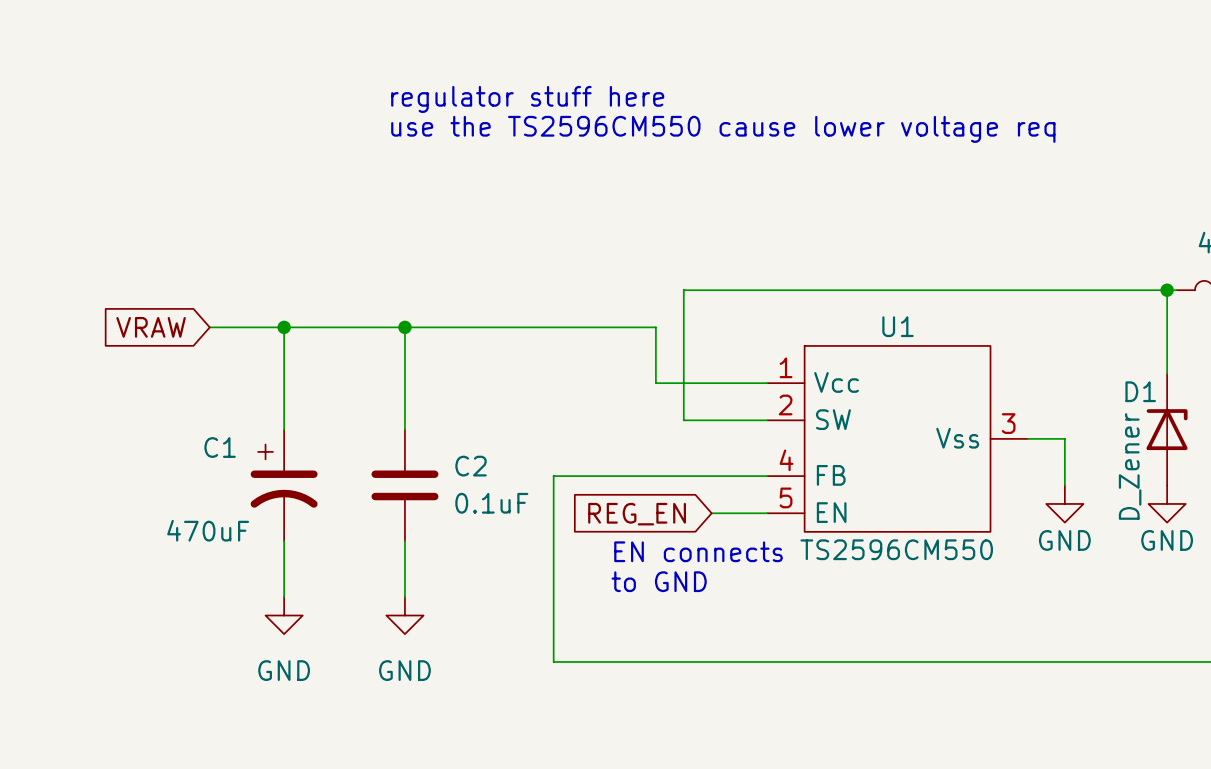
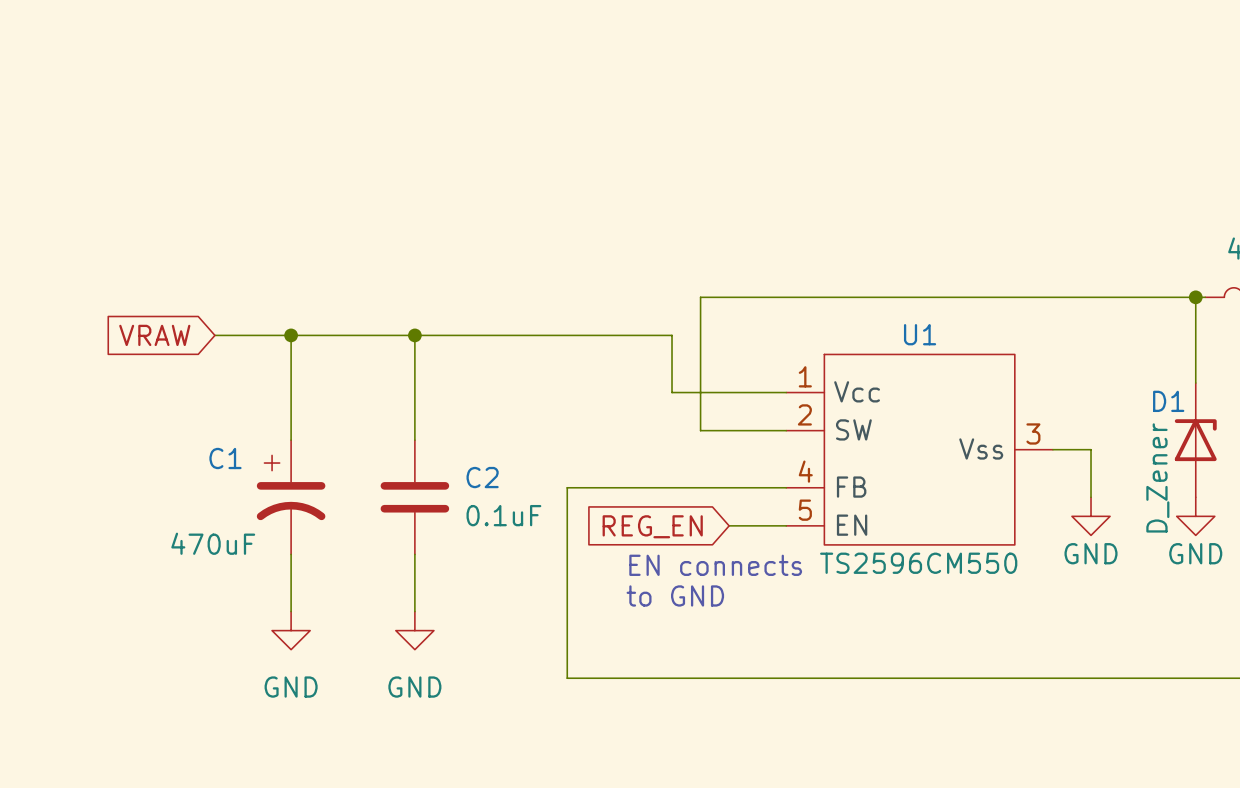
text: regulator stuff here (527, 99) -> none
text: use the TS2596CM550 cause lower voltage req (723, 129) -> none

